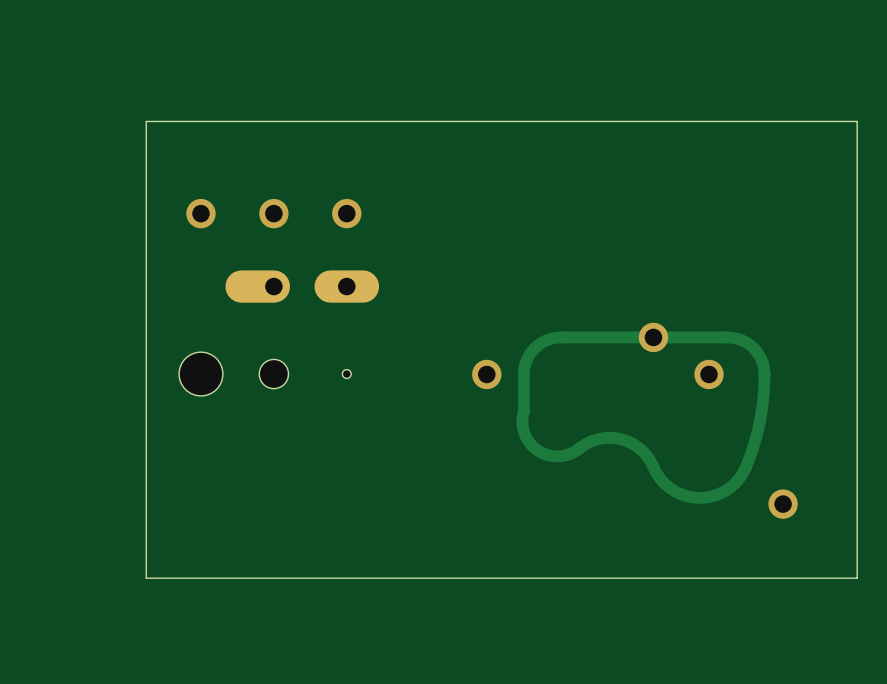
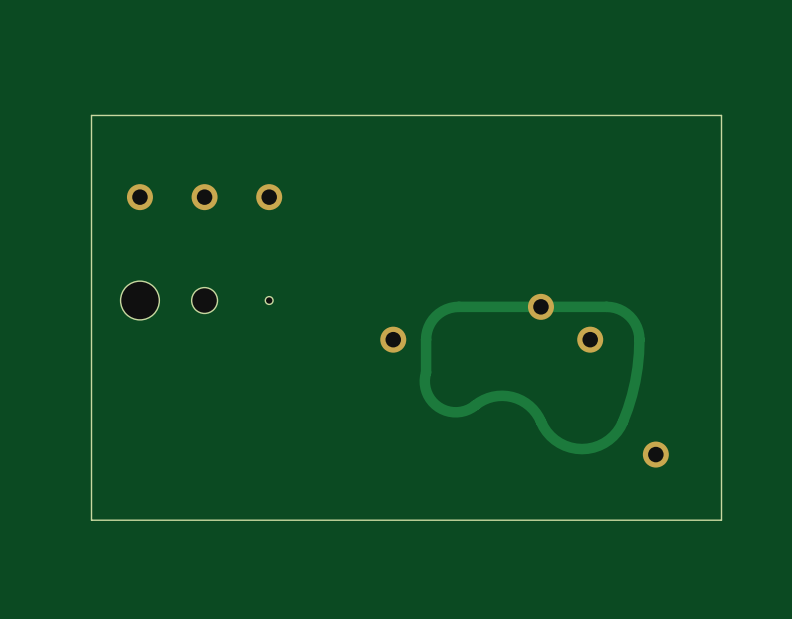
part: (257, 286) -> none
part: (346, 286) -> none
hole position: (200, 374) -> (139, 300)
hole position: (273, 374) -> (204, 300)
hole position: (346, 374) -> (269, 300)

